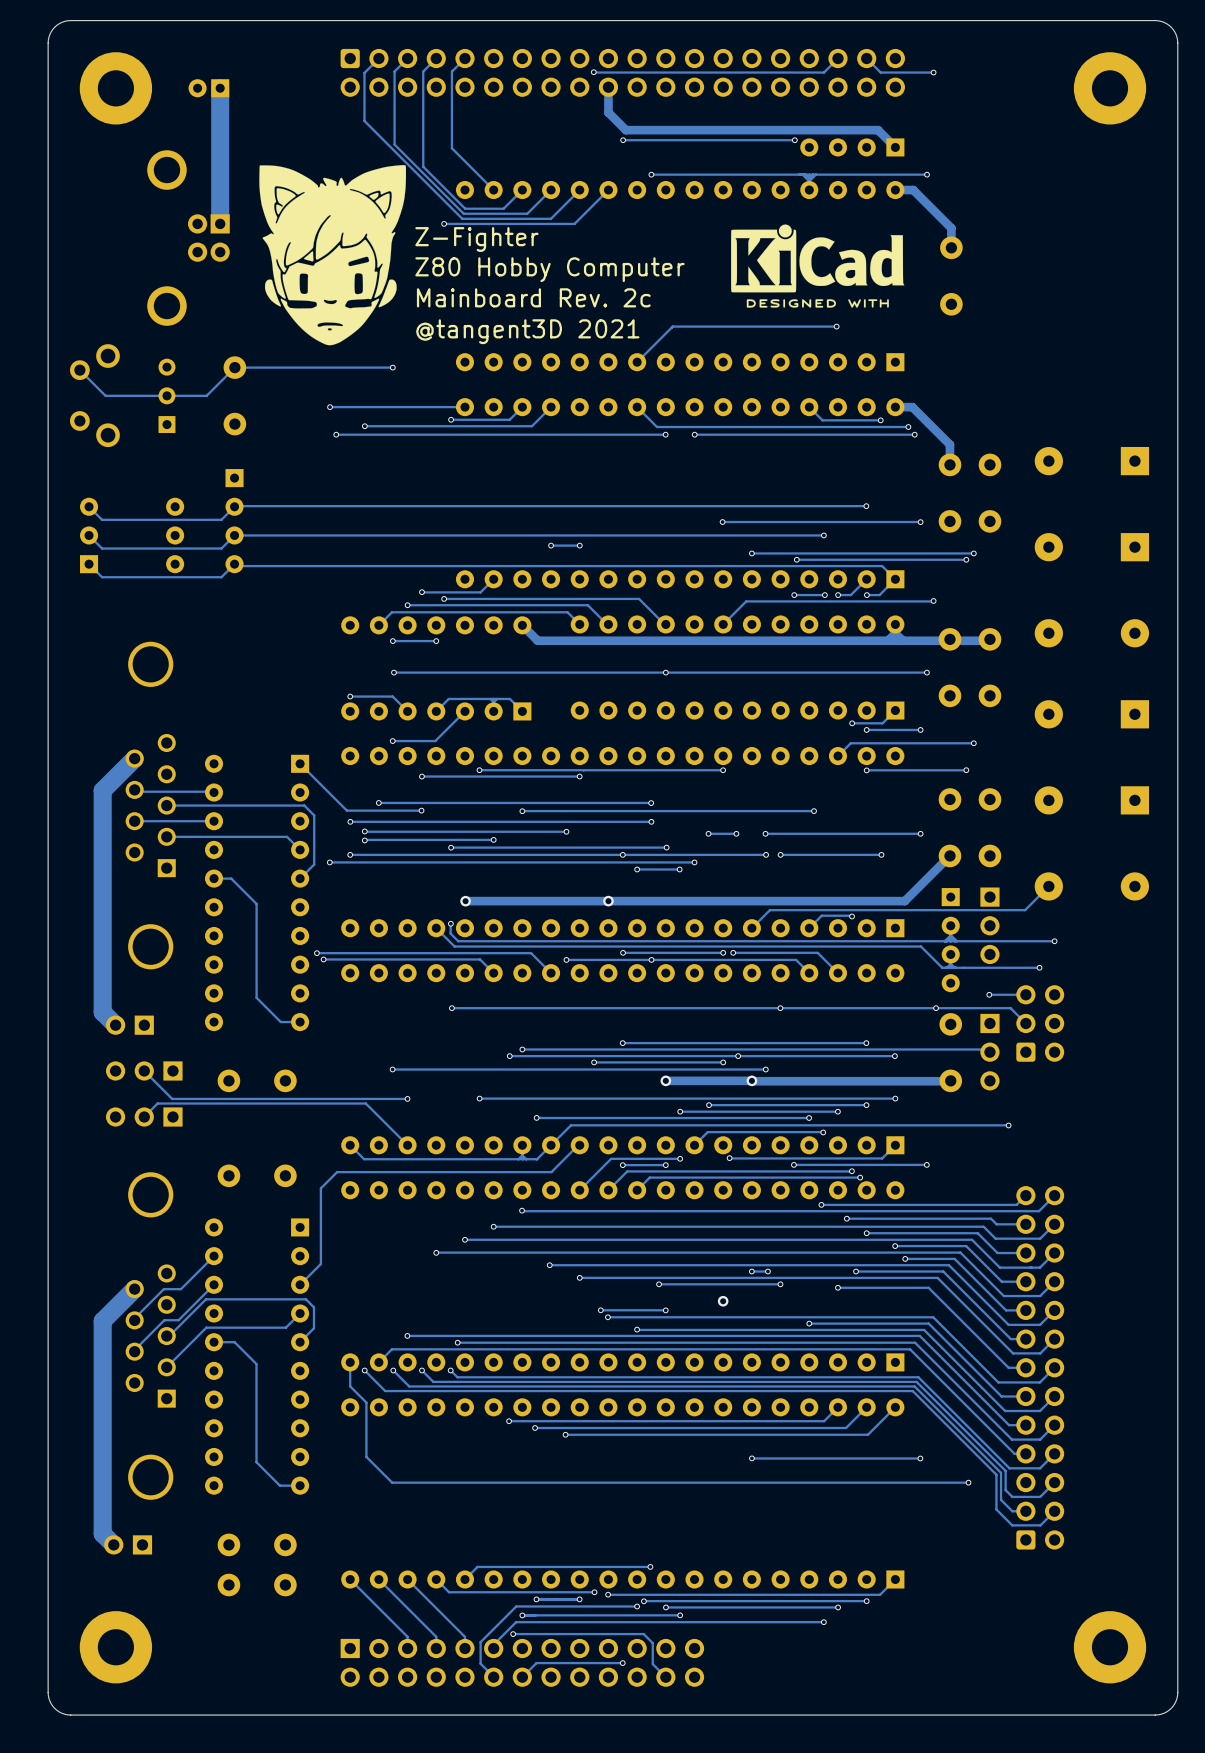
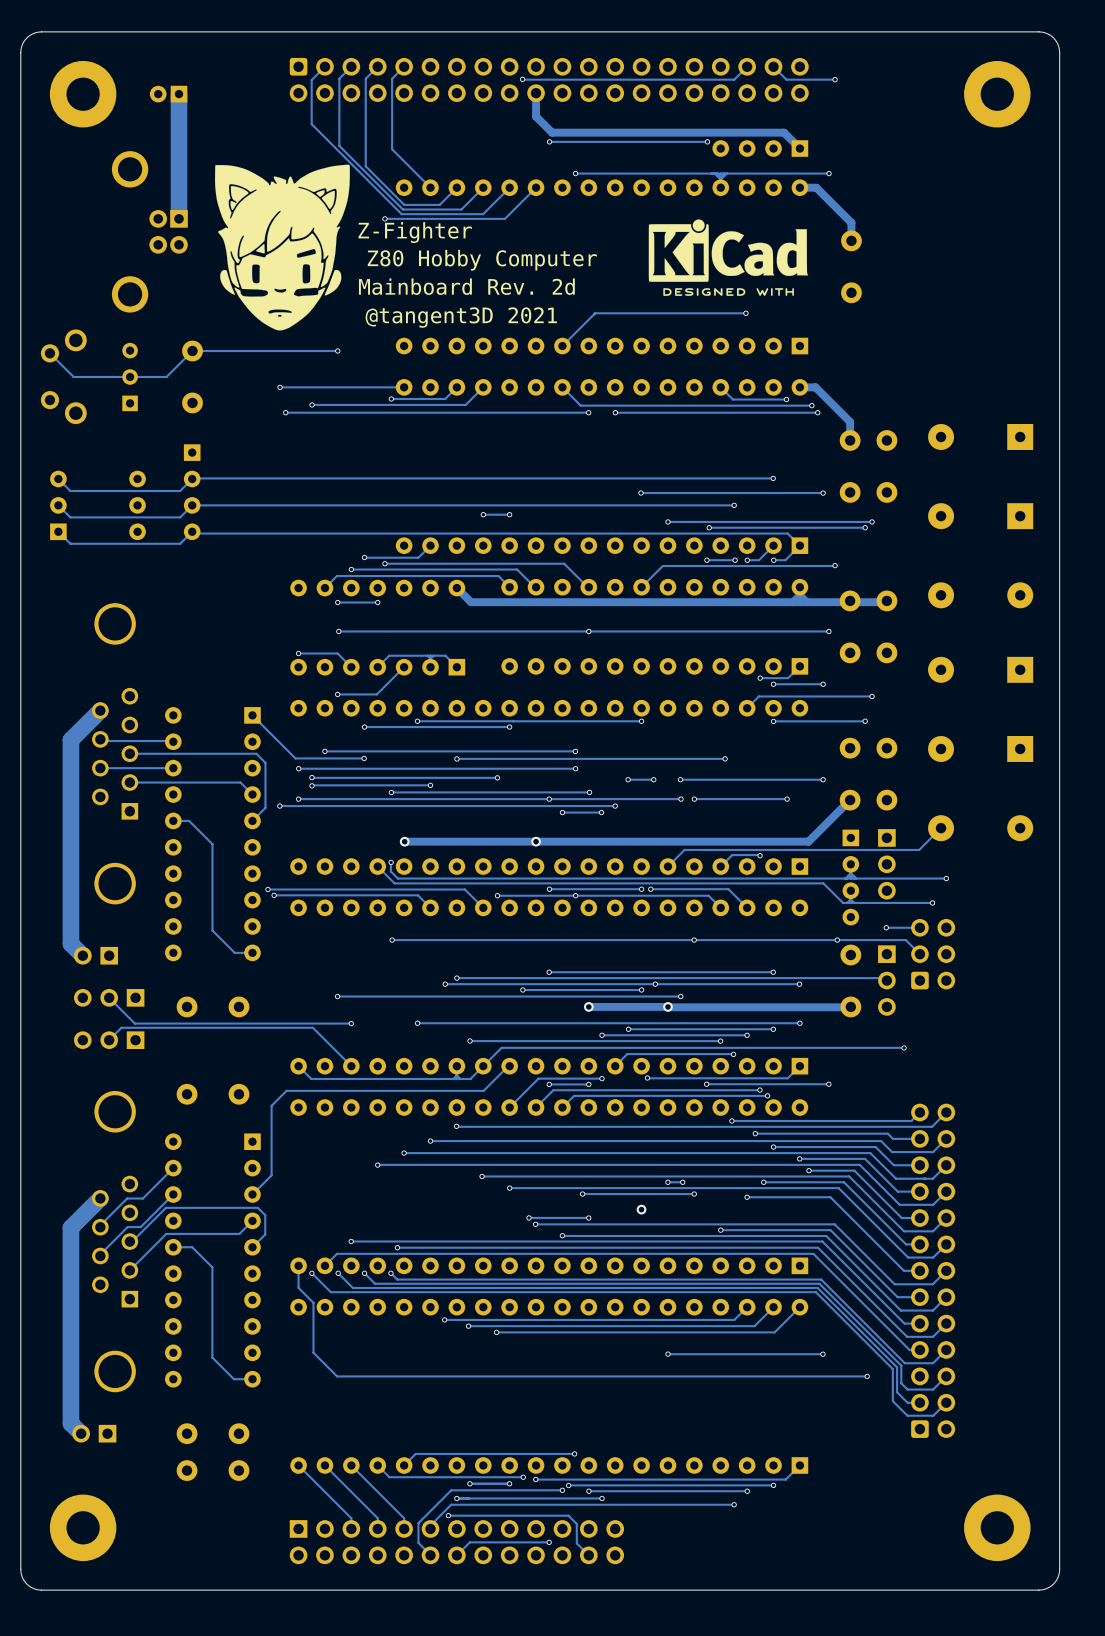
text: Mainboard Rev. 2c (533, 297) -> Mainboard Rev. 2d (466, 286)

